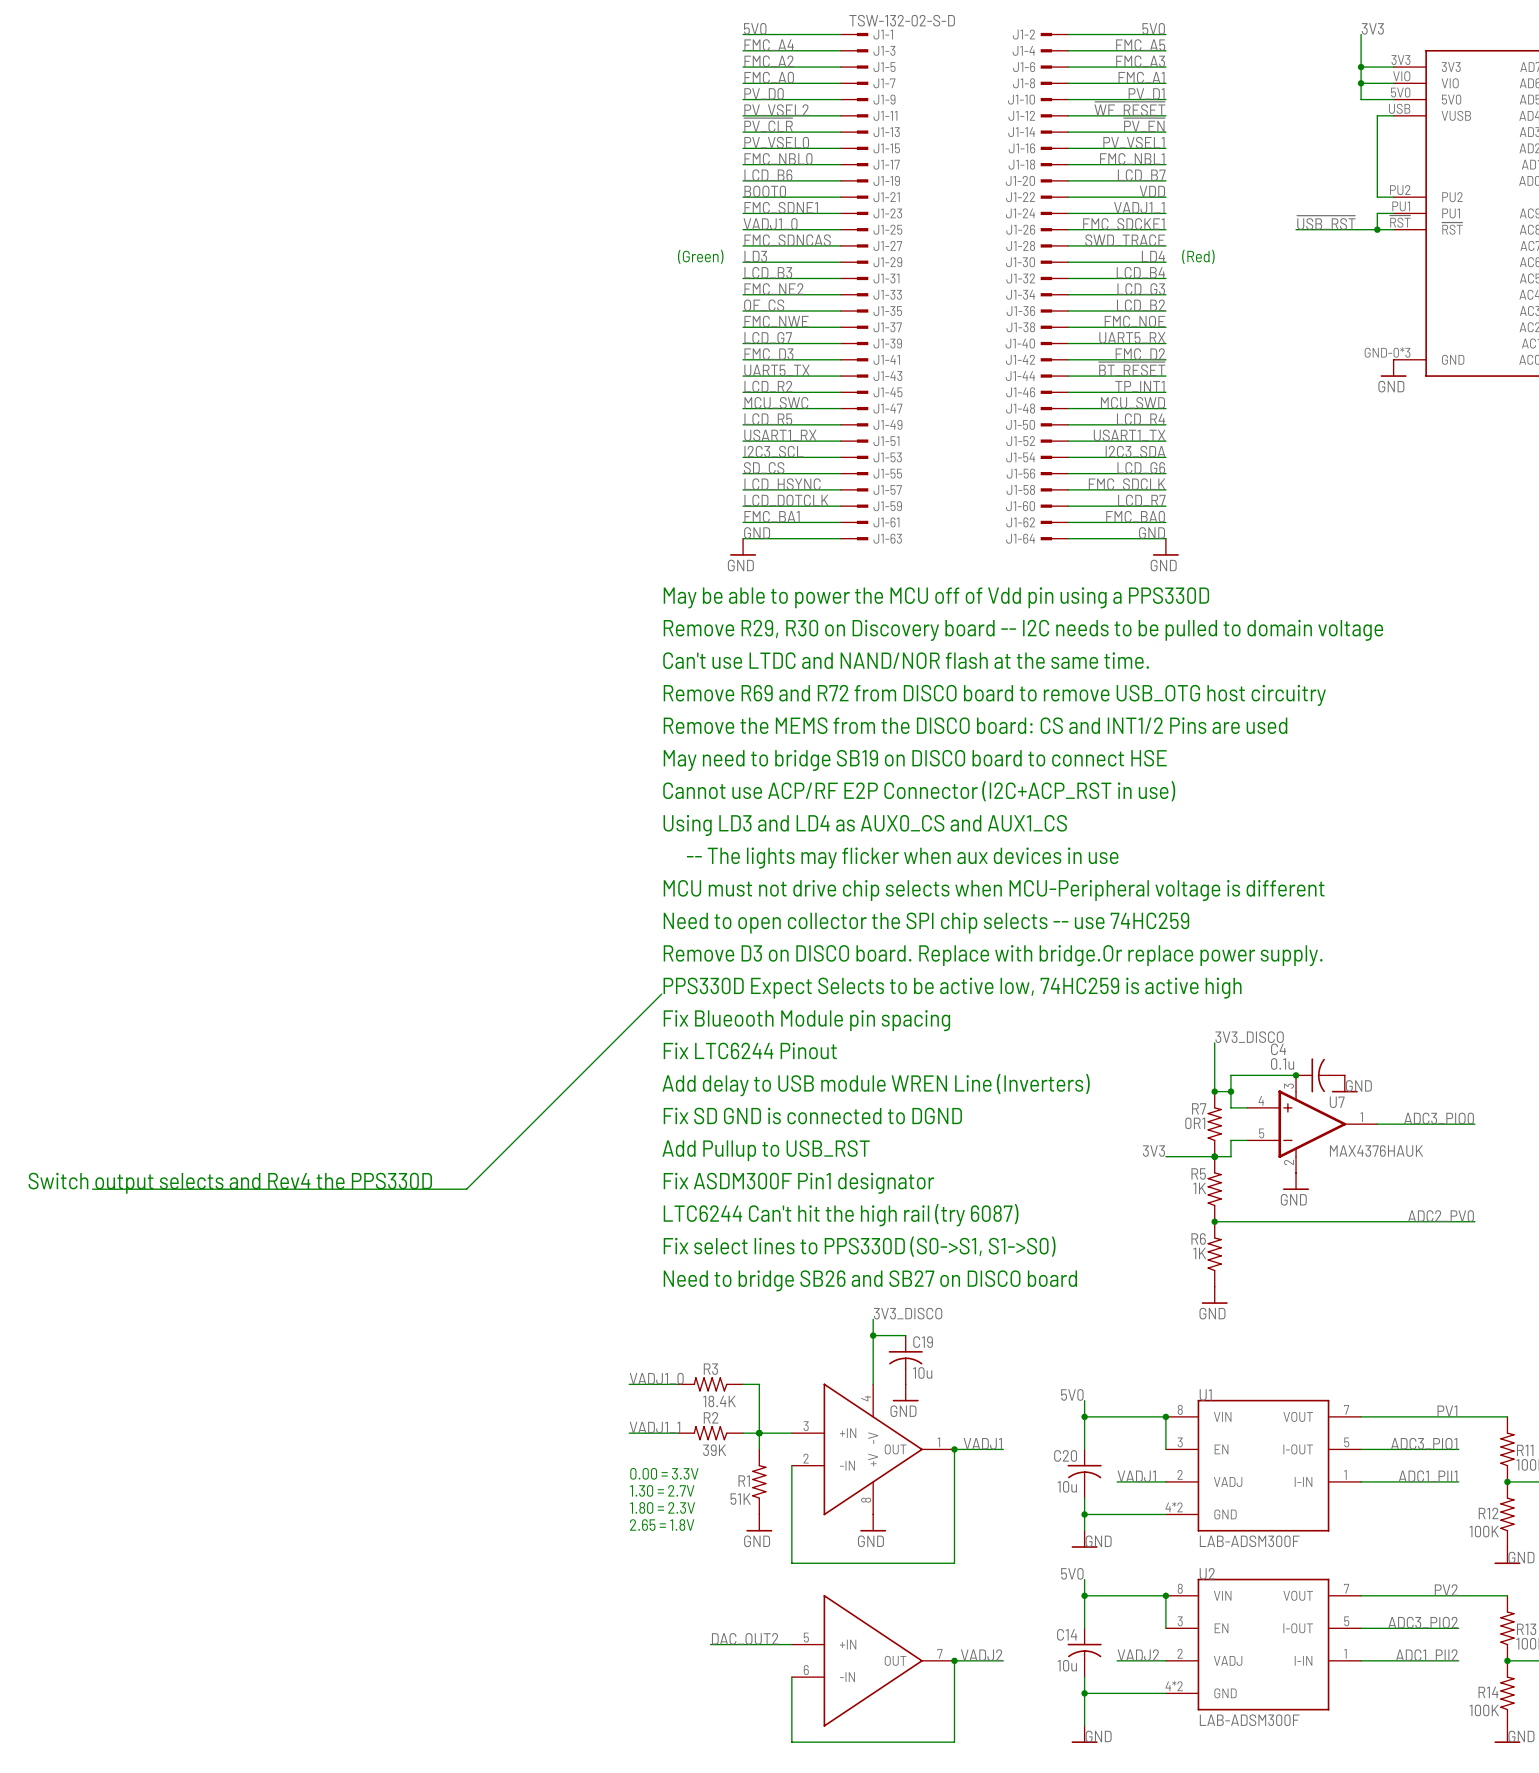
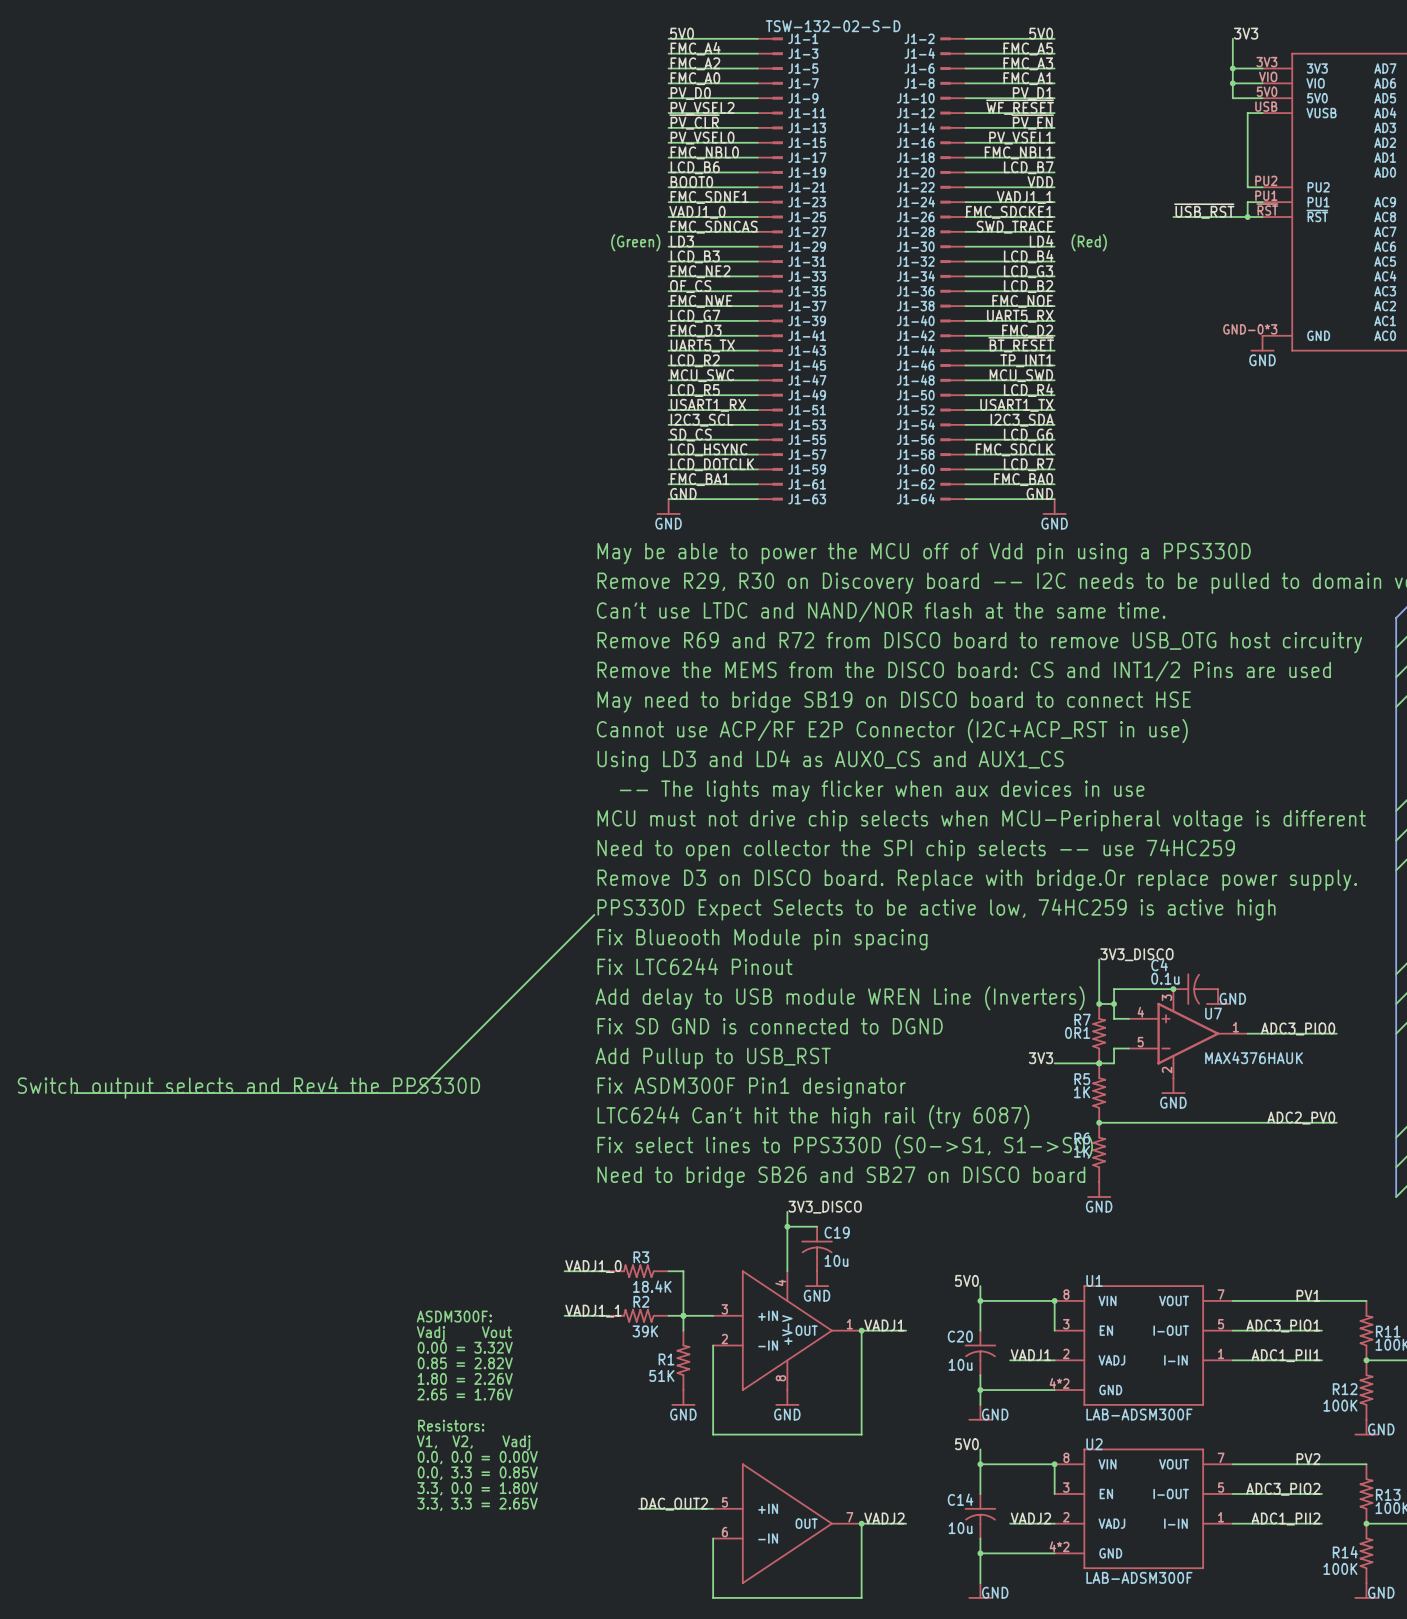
text: none -> ASDM300F: (454, 1316)
text: none -> Vadj Vout (464, 1333)
text: none -> 0.00 = 3.32V (465, 1347)
text: 0.00 = 3.3V (664, 1473) -> none
text: none -> 0.85 = 2.82V (465, 1363)
text: 1.30 = 2.7V (662, 1490) -> none
text: none -> 1.80 = 2.26V (465, 1378)
text: 1.80 = 2.3V (662, 1507) -> none
text: none -> 2.65 = 1.76V (465, 1394)
text: 2.65 = 1.8V (662, 1525) -> none
text: none -> Resistors: (451, 1425)
text: none -> V1, V2, Vadj (473, 1443)
text: none -> 0.0, 0.0 = 0.00V (477, 1457)
text: none -> 0.0, 3.3 = 0.85V (477, 1473)
text: none -> 3.3, 0.0 = 1.80V (477, 1488)
text: none -> 3.3, 3.3 = 2.65V (477, 1504)

